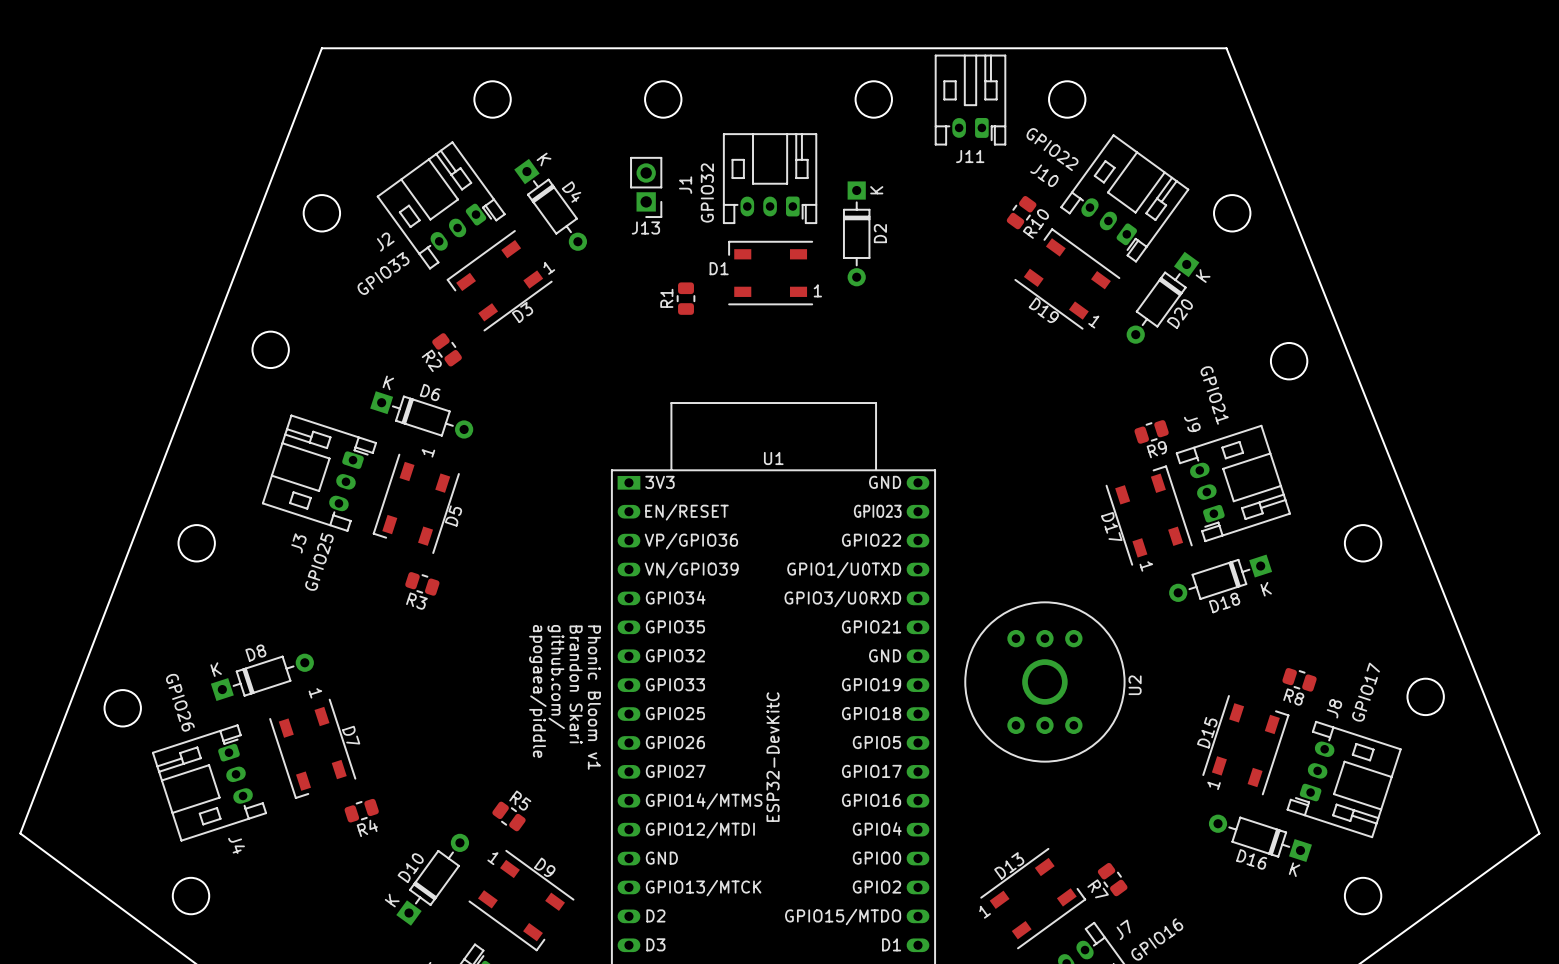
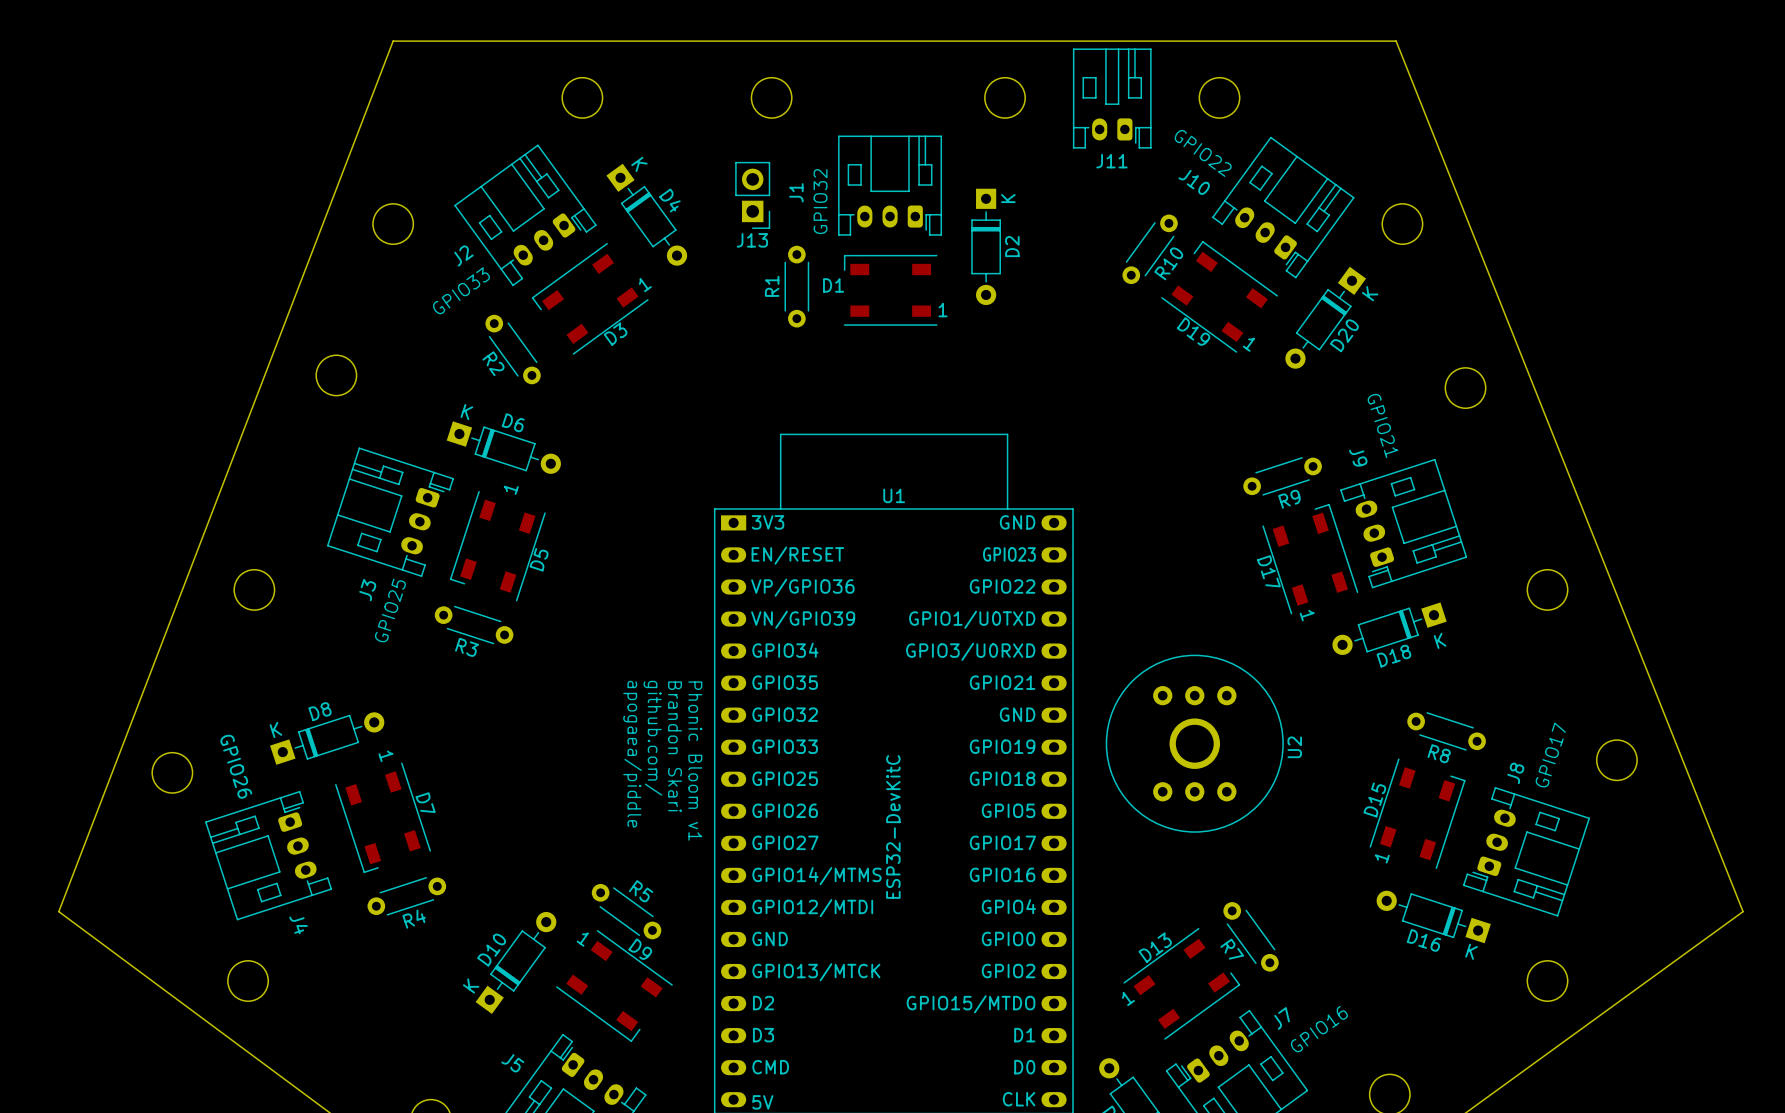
R10 footprint: [1006, 195, 1037, 230] -> [1122, 214, 1178, 285]
R1 footprint: [676, 282, 696, 315] -> [784, 245, 810, 328]
R2 footprint: [432, 333, 462, 367] -> [485, 314, 541, 385]
R9 footprint: [1134, 420, 1169, 444] -> [1243, 457, 1322, 496]
R3 footprint: [405, 572, 440, 596] -> [434, 605, 514, 645]
R8 footprint: [1282, 667, 1317, 692] -> [1407, 712, 1486, 751]
R4 footprint: [344, 798, 379, 823] -> [367, 877, 447, 916]
R5 footprint: [492, 801, 526, 832] -> [591, 883, 662, 940]
R7 footprint: [1097, 862, 1128, 897] -> [1223, 902, 1279, 972]

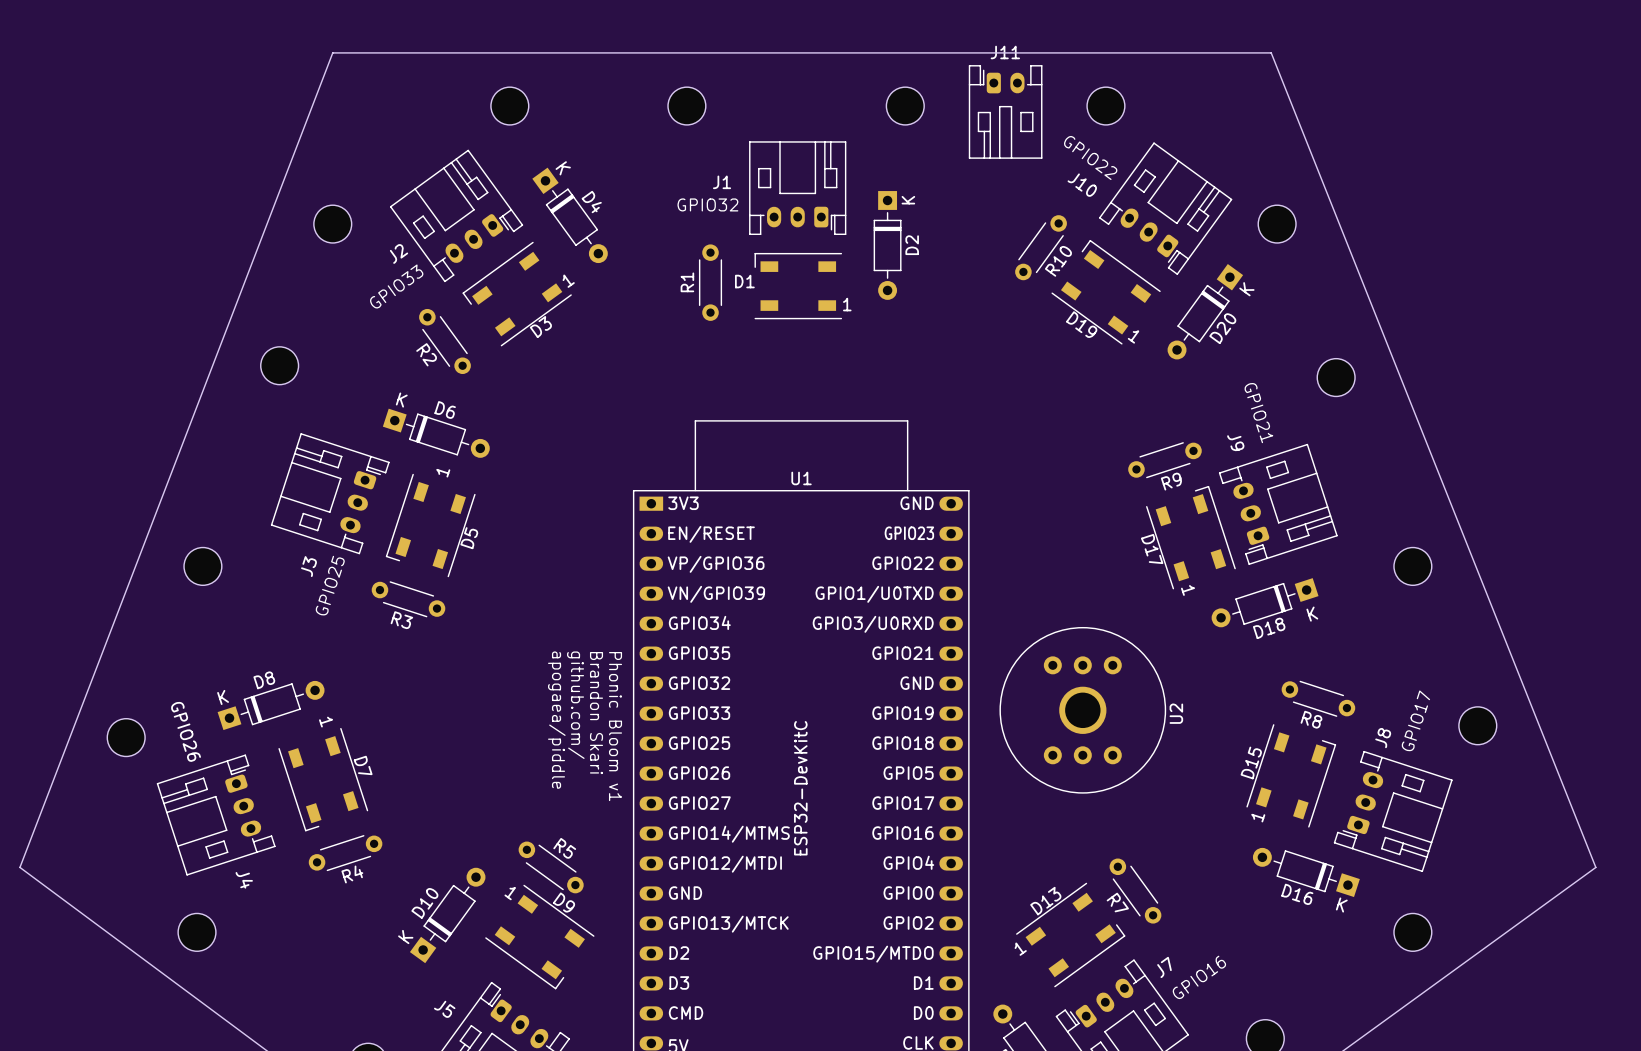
J11 rotation: 0° (1112, 98) -> 180° (1005, 111)
J1 name rotation: 0° (796, 192) -> 90° clockwise (722, 182)
J13: (752, 195) -> none
text rotation: 0° (820, 201) -> 90° clockwise (707, 204)

